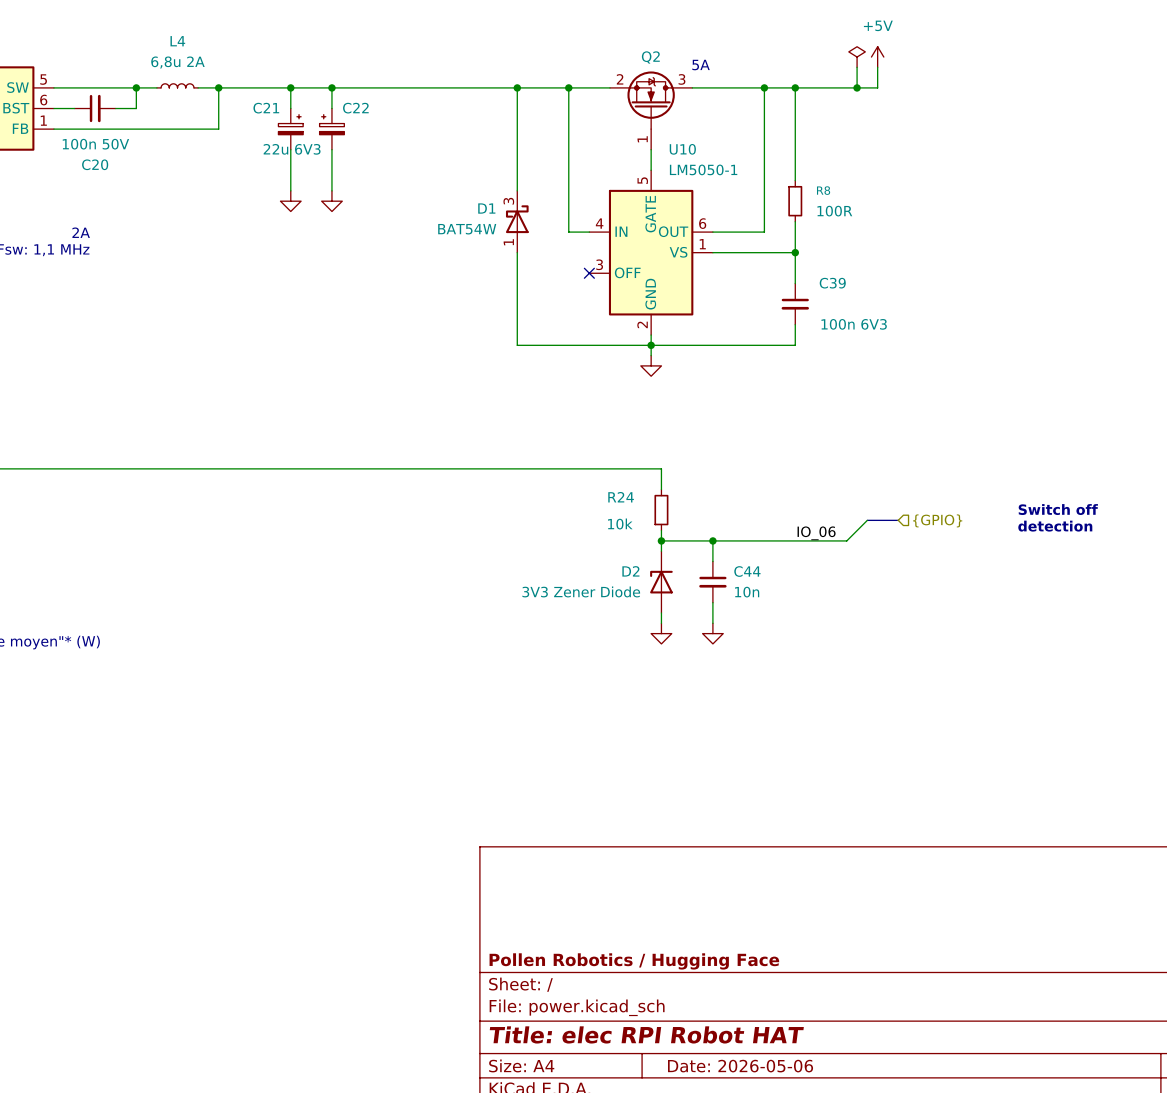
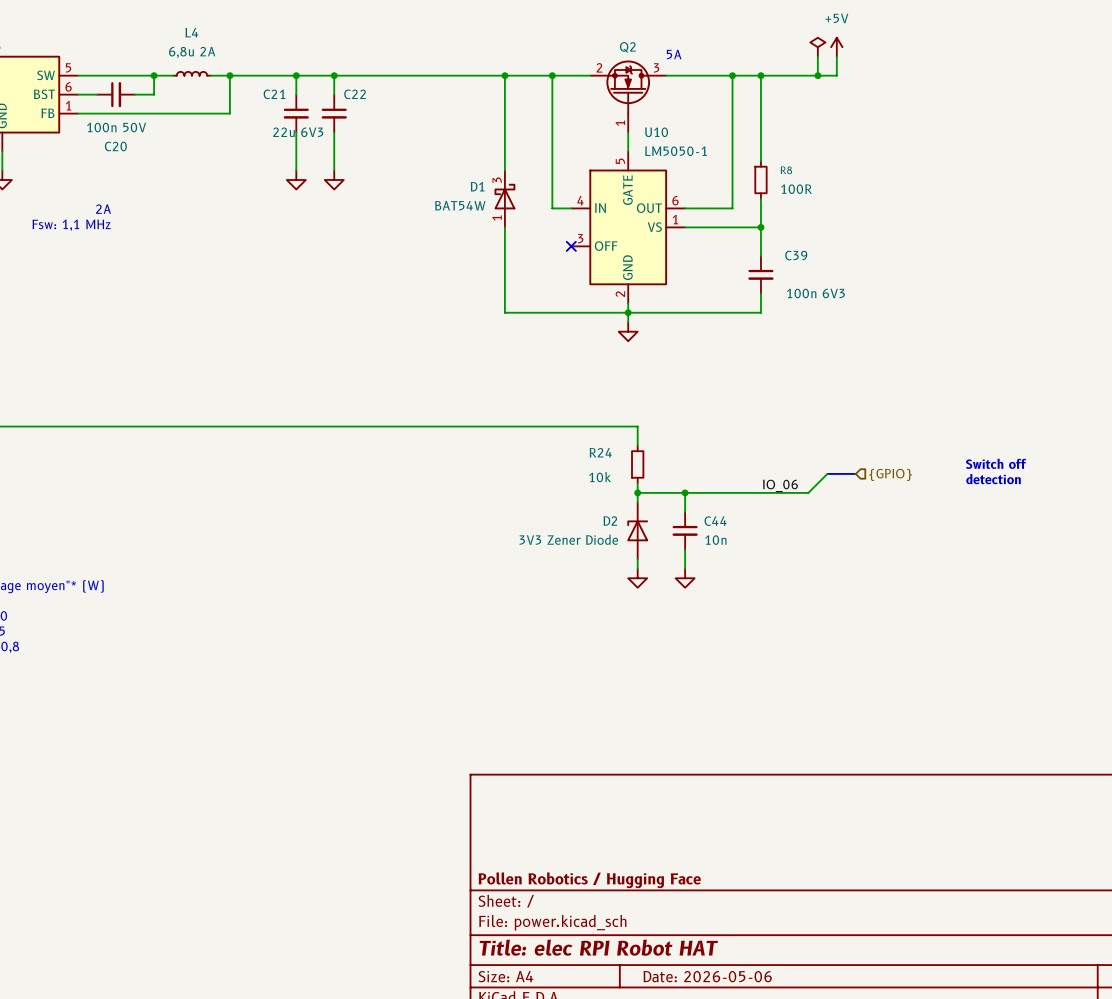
C21 symbol: [278, 108, 304, 150] -> [283, 94, 309, 133]
C22 symbol: [319, 108, 345, 150] -> [321, 94, 347, 133]

